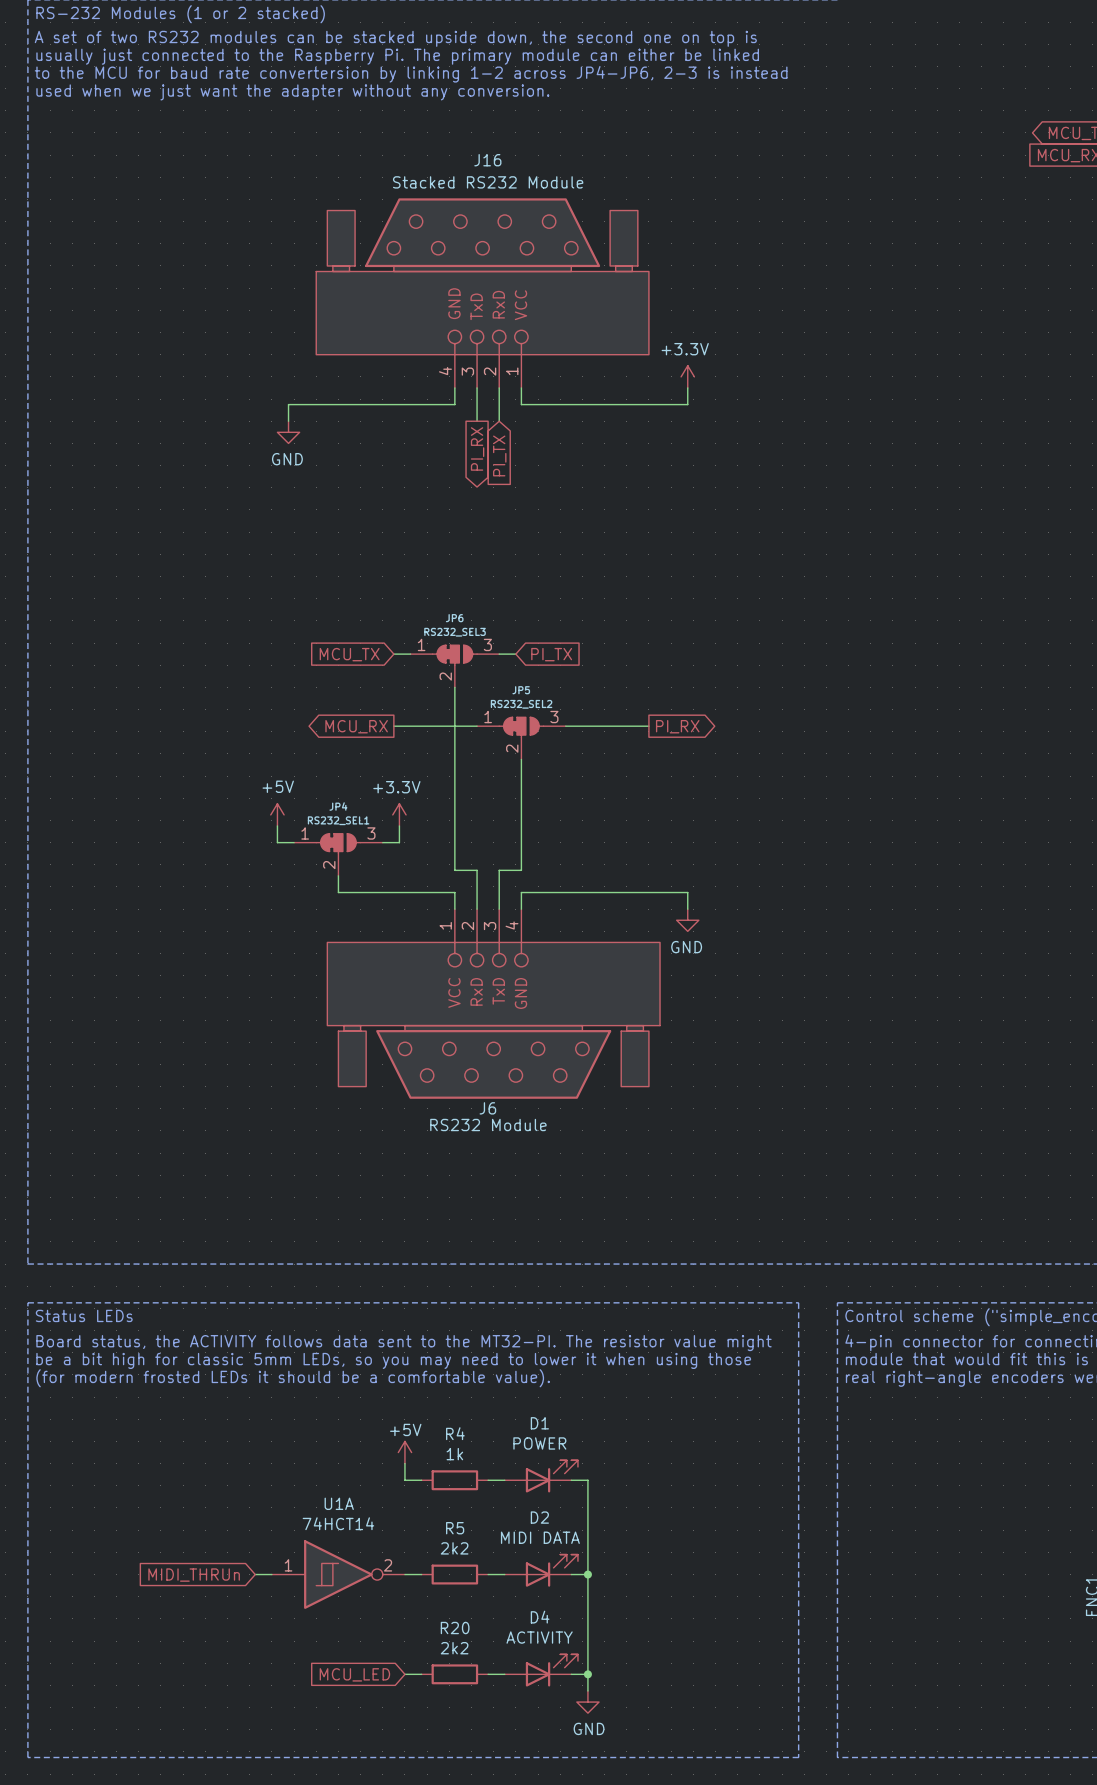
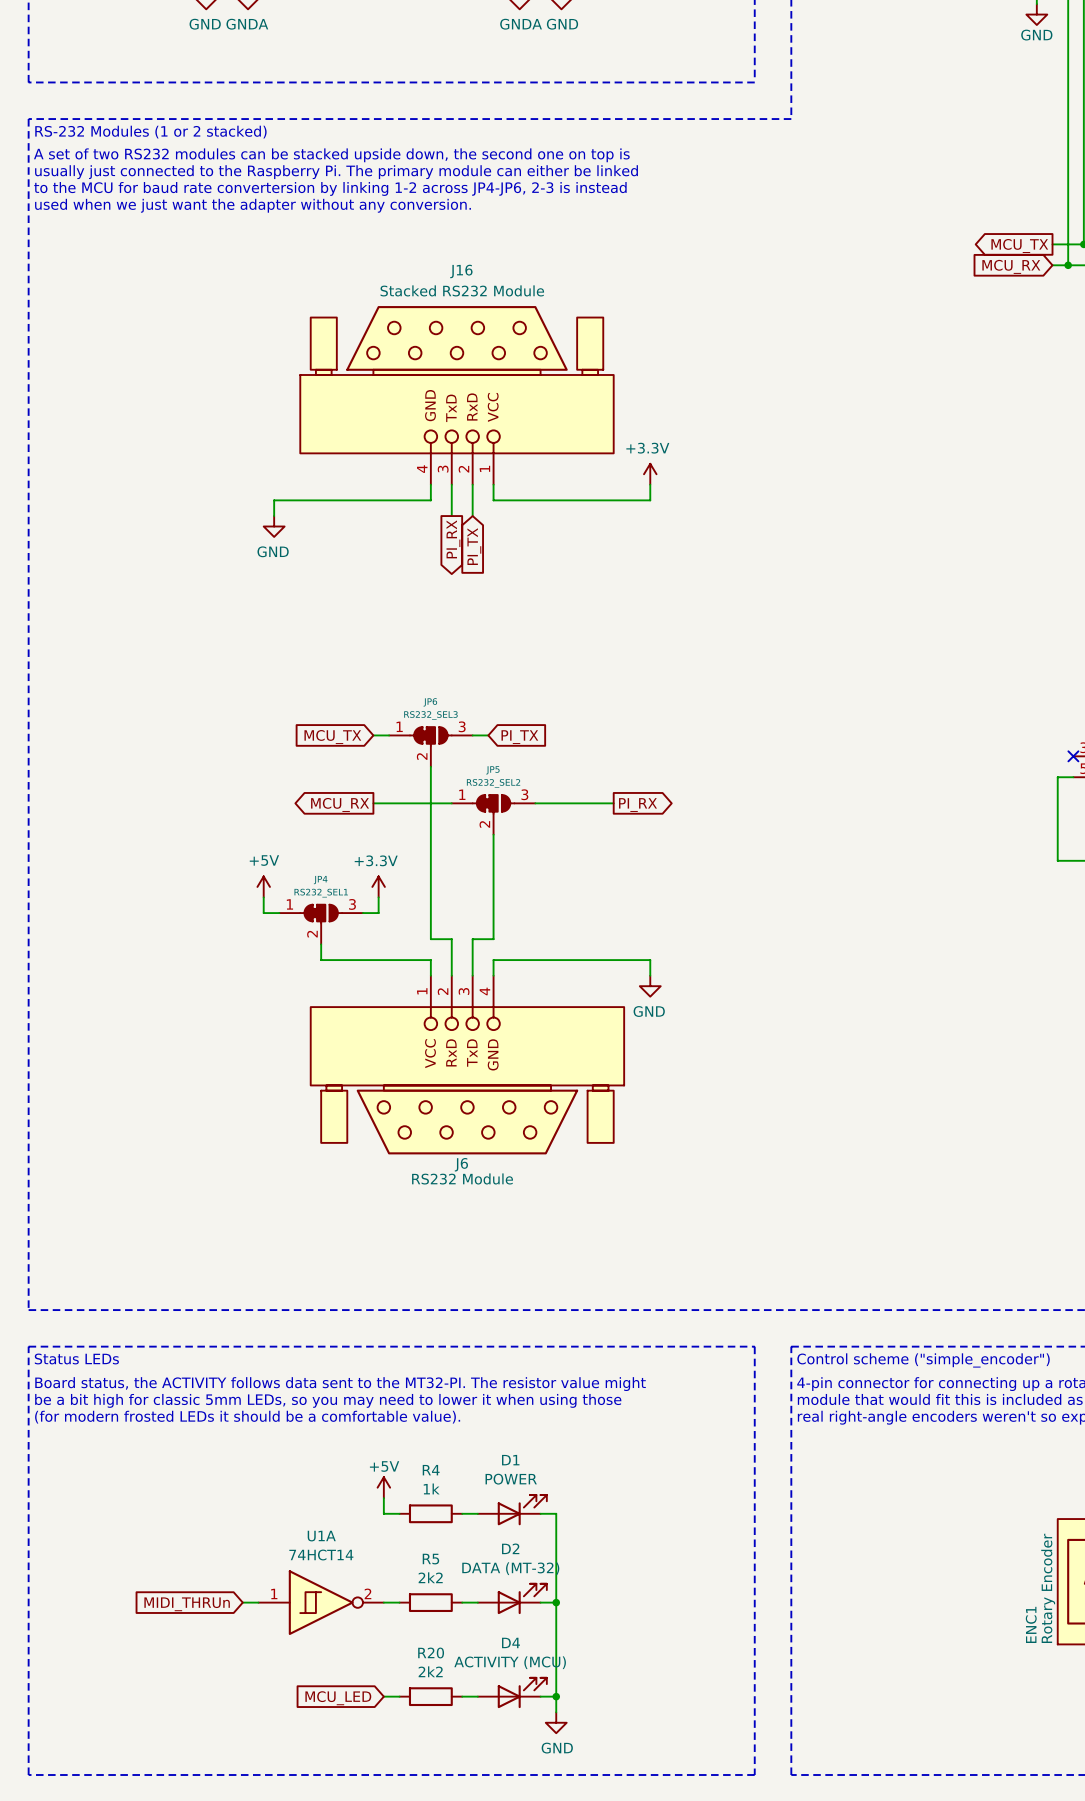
D2 value: MIDI DATA (540, 1537) -> DATA (MT-32) (510, 1568)
D4 value: ACTIVITY (539, 1637) -> ACTIVITY (MCU) (510, 1662)

